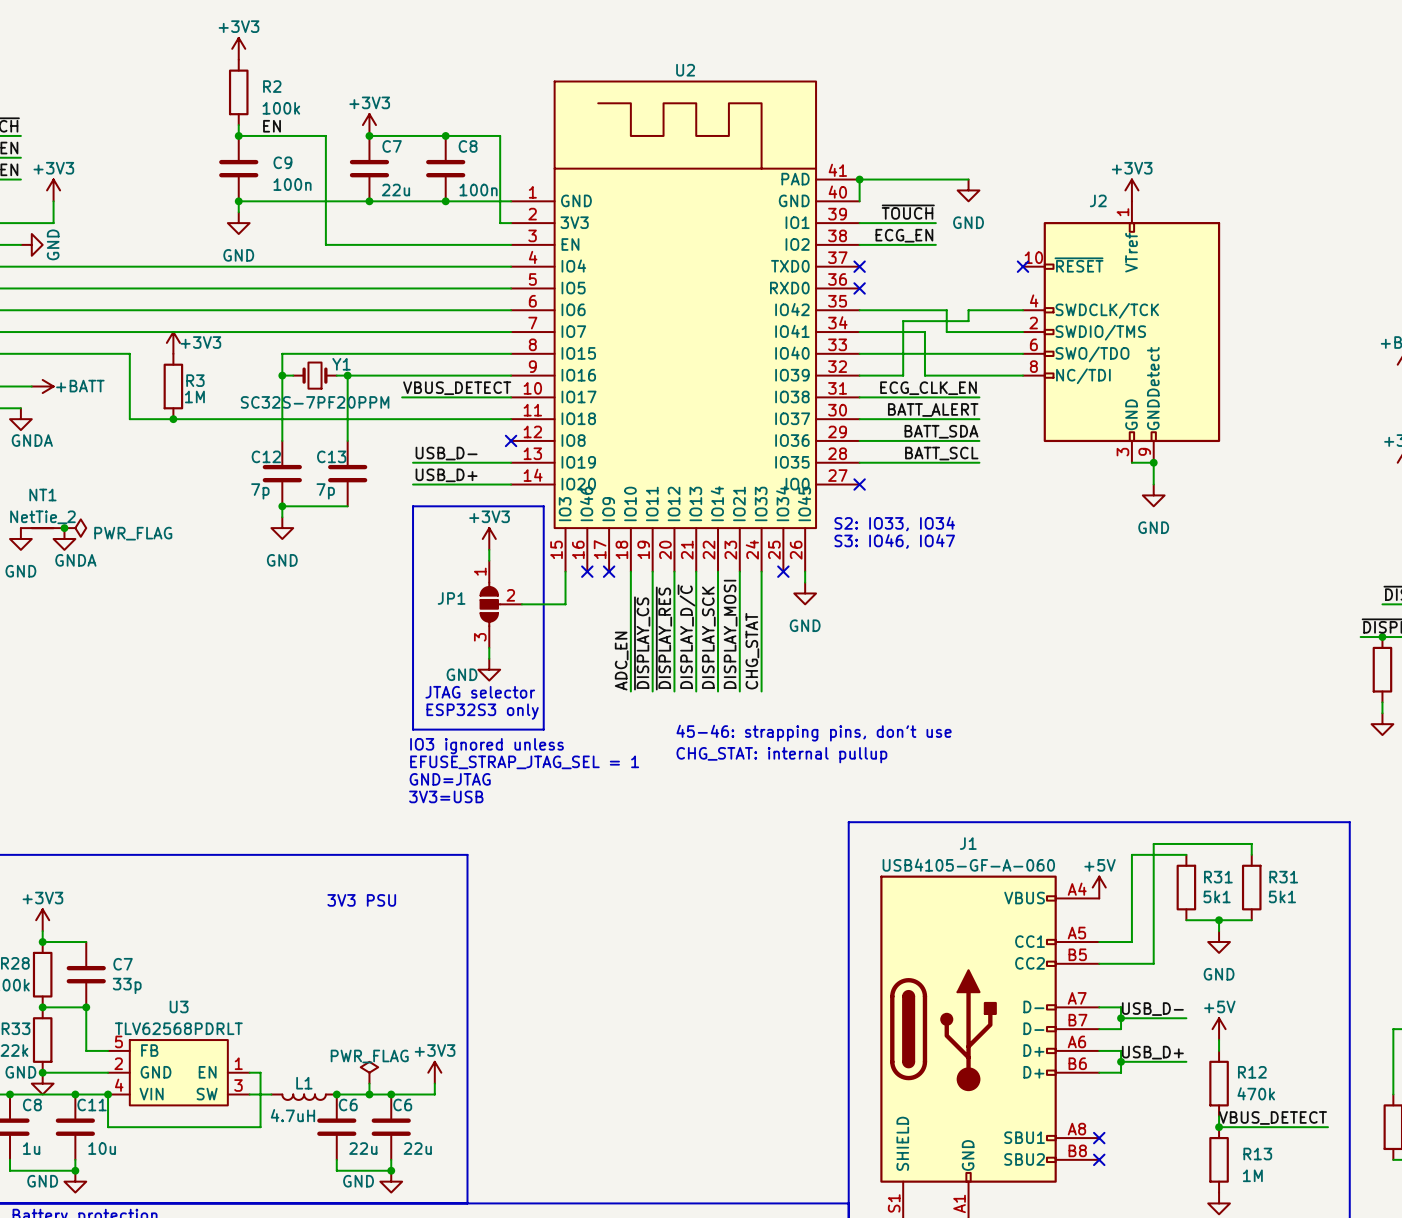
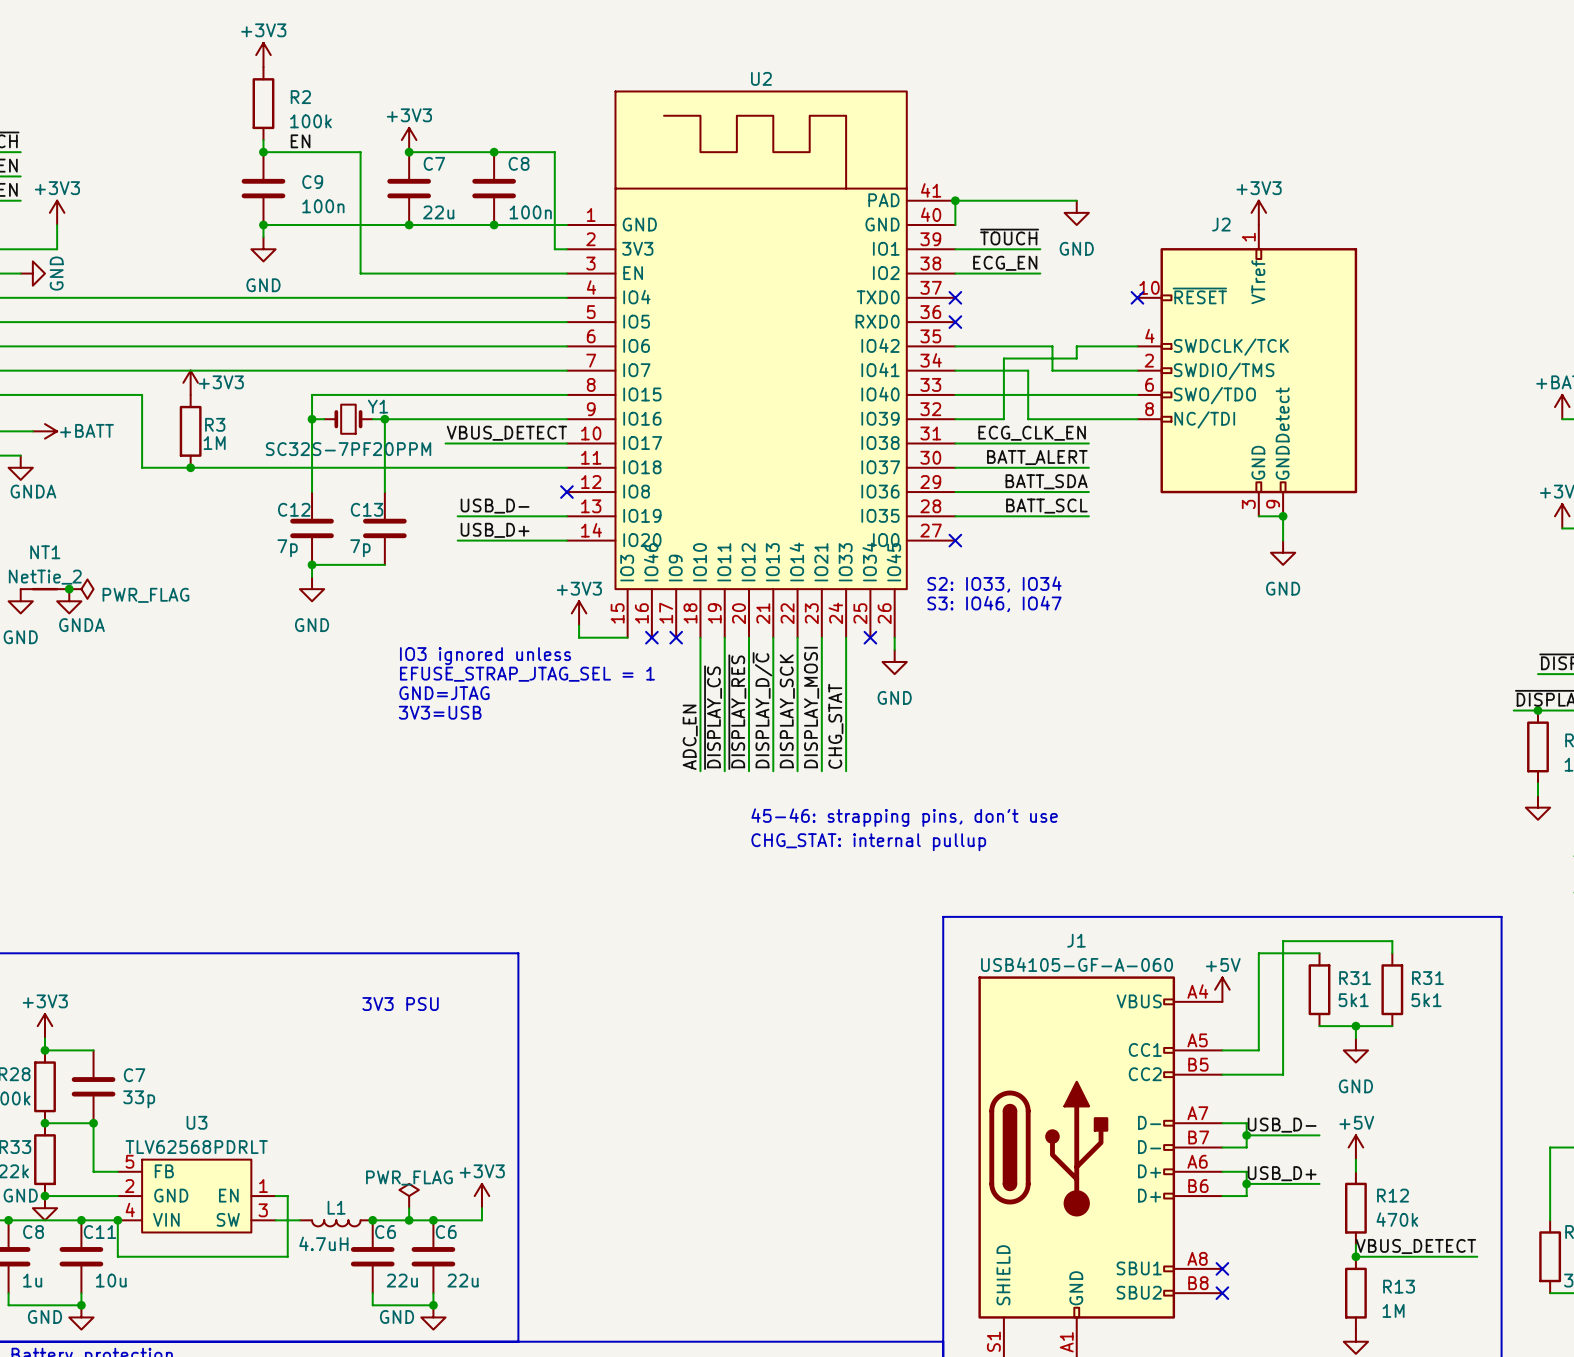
line: (413, 506) (543, 506) (543, 729) (413, 729) (413, 506) -> none
power symbol position: +3V3 (489, 538) -> +3V3 (579, 613)
wire: (489, 549) (489, 560) -> none
wire: (565, 571) (565, 604) (521, 604) -> (627, 637) (579, 637) (579, 625)
JP1: (501, 604) -> none
wire: (489, 647) (489, 658) -> none
power symbol: GND (489, 669) -> none
text: JTAG selector (480, 692) -> none
text: ESP32S3 only (482, 711) -> none
text position: IO3 ignored unless (487, 746) -> IO3 ignored unless (485, 656)
text position: EFUSE_STRAP_JTAG_SEL = 1 (524, 762) -> EFUSE_STRAP_JTAG_SEL = 1 (527, 674)
text position: GND=JTAG (450, 779) -> GND=JTAG (444, 693)
text position: 3V3=USB (446, 796) -> 3V3=USB (440, 712)

